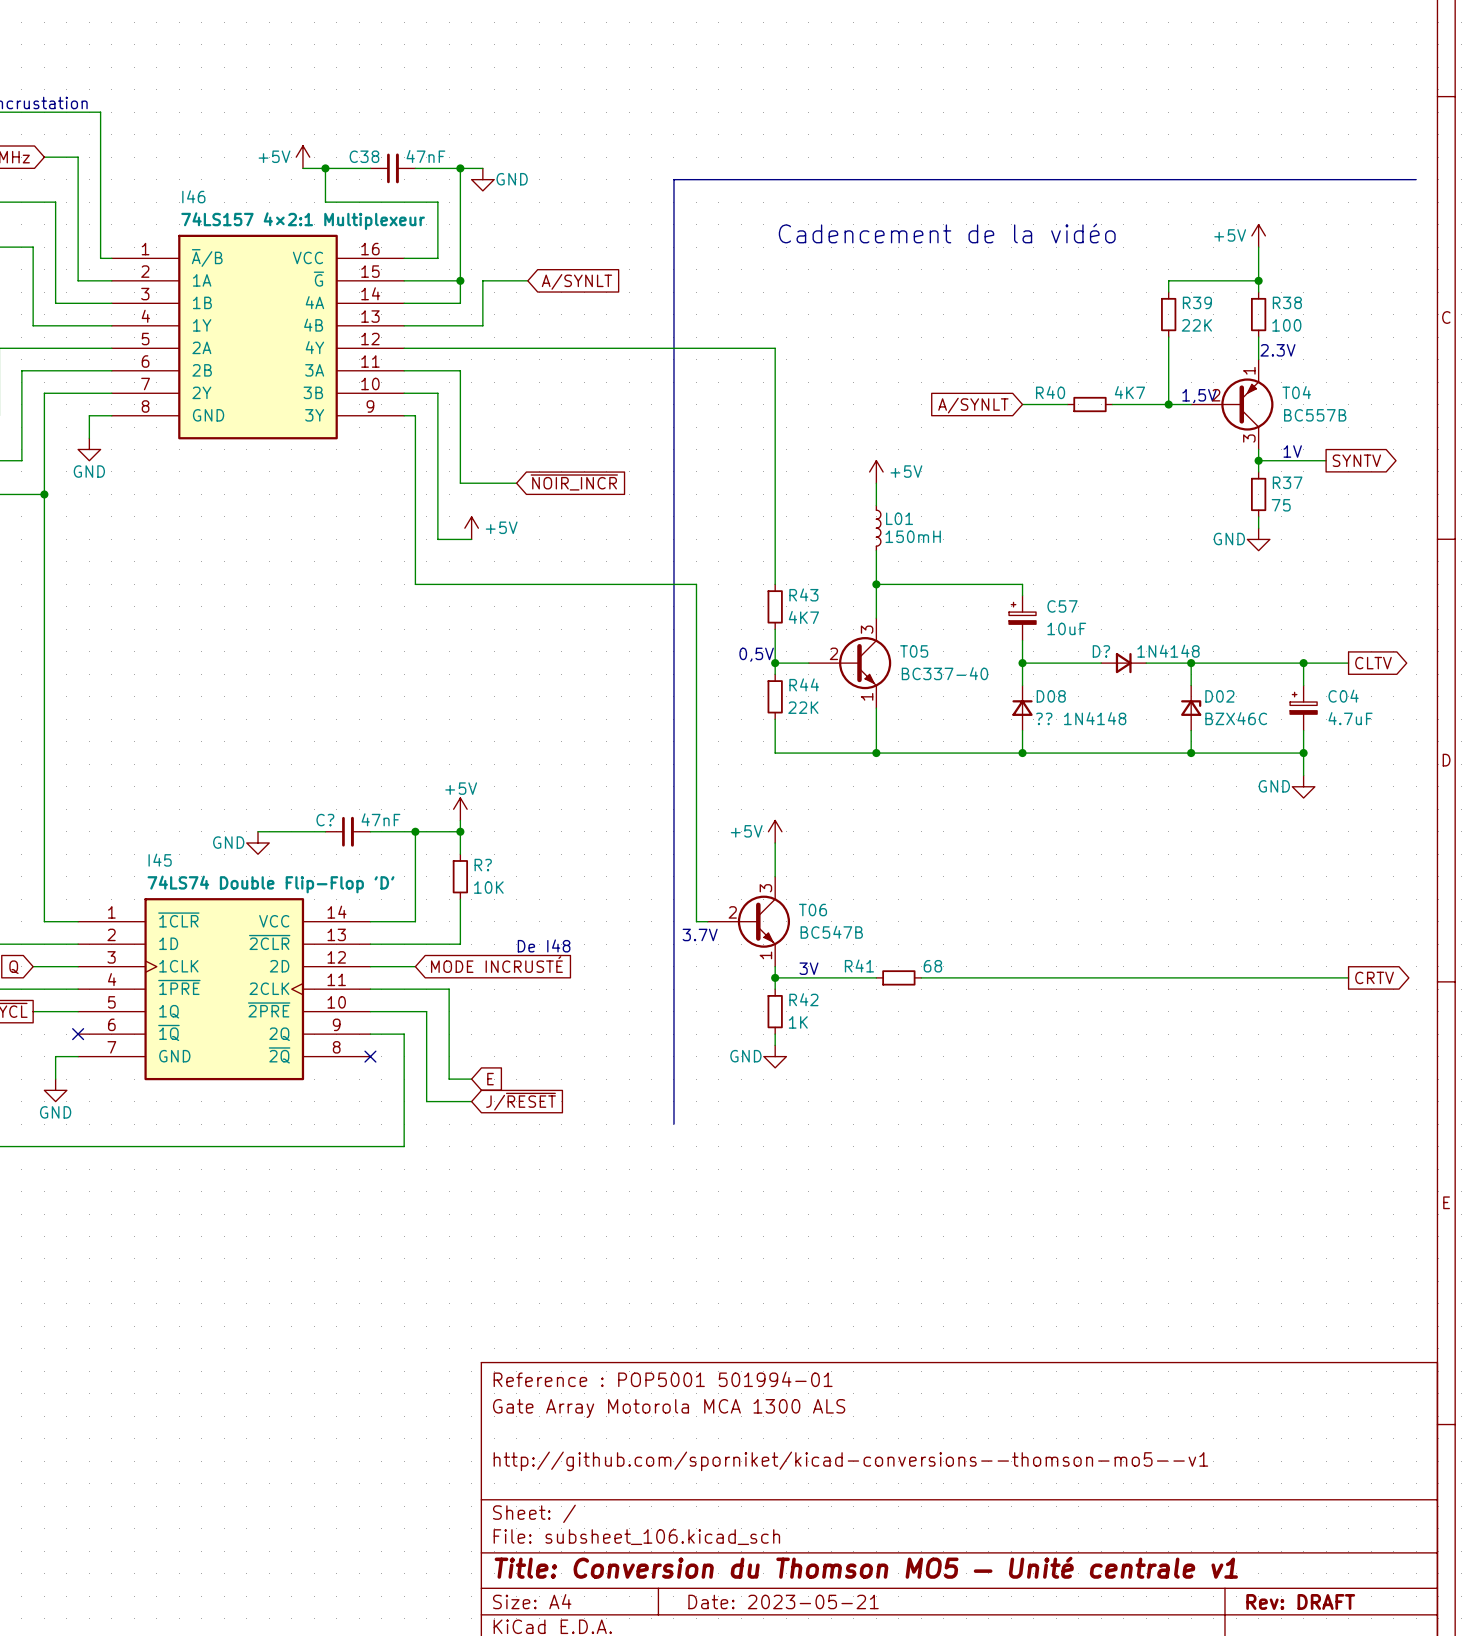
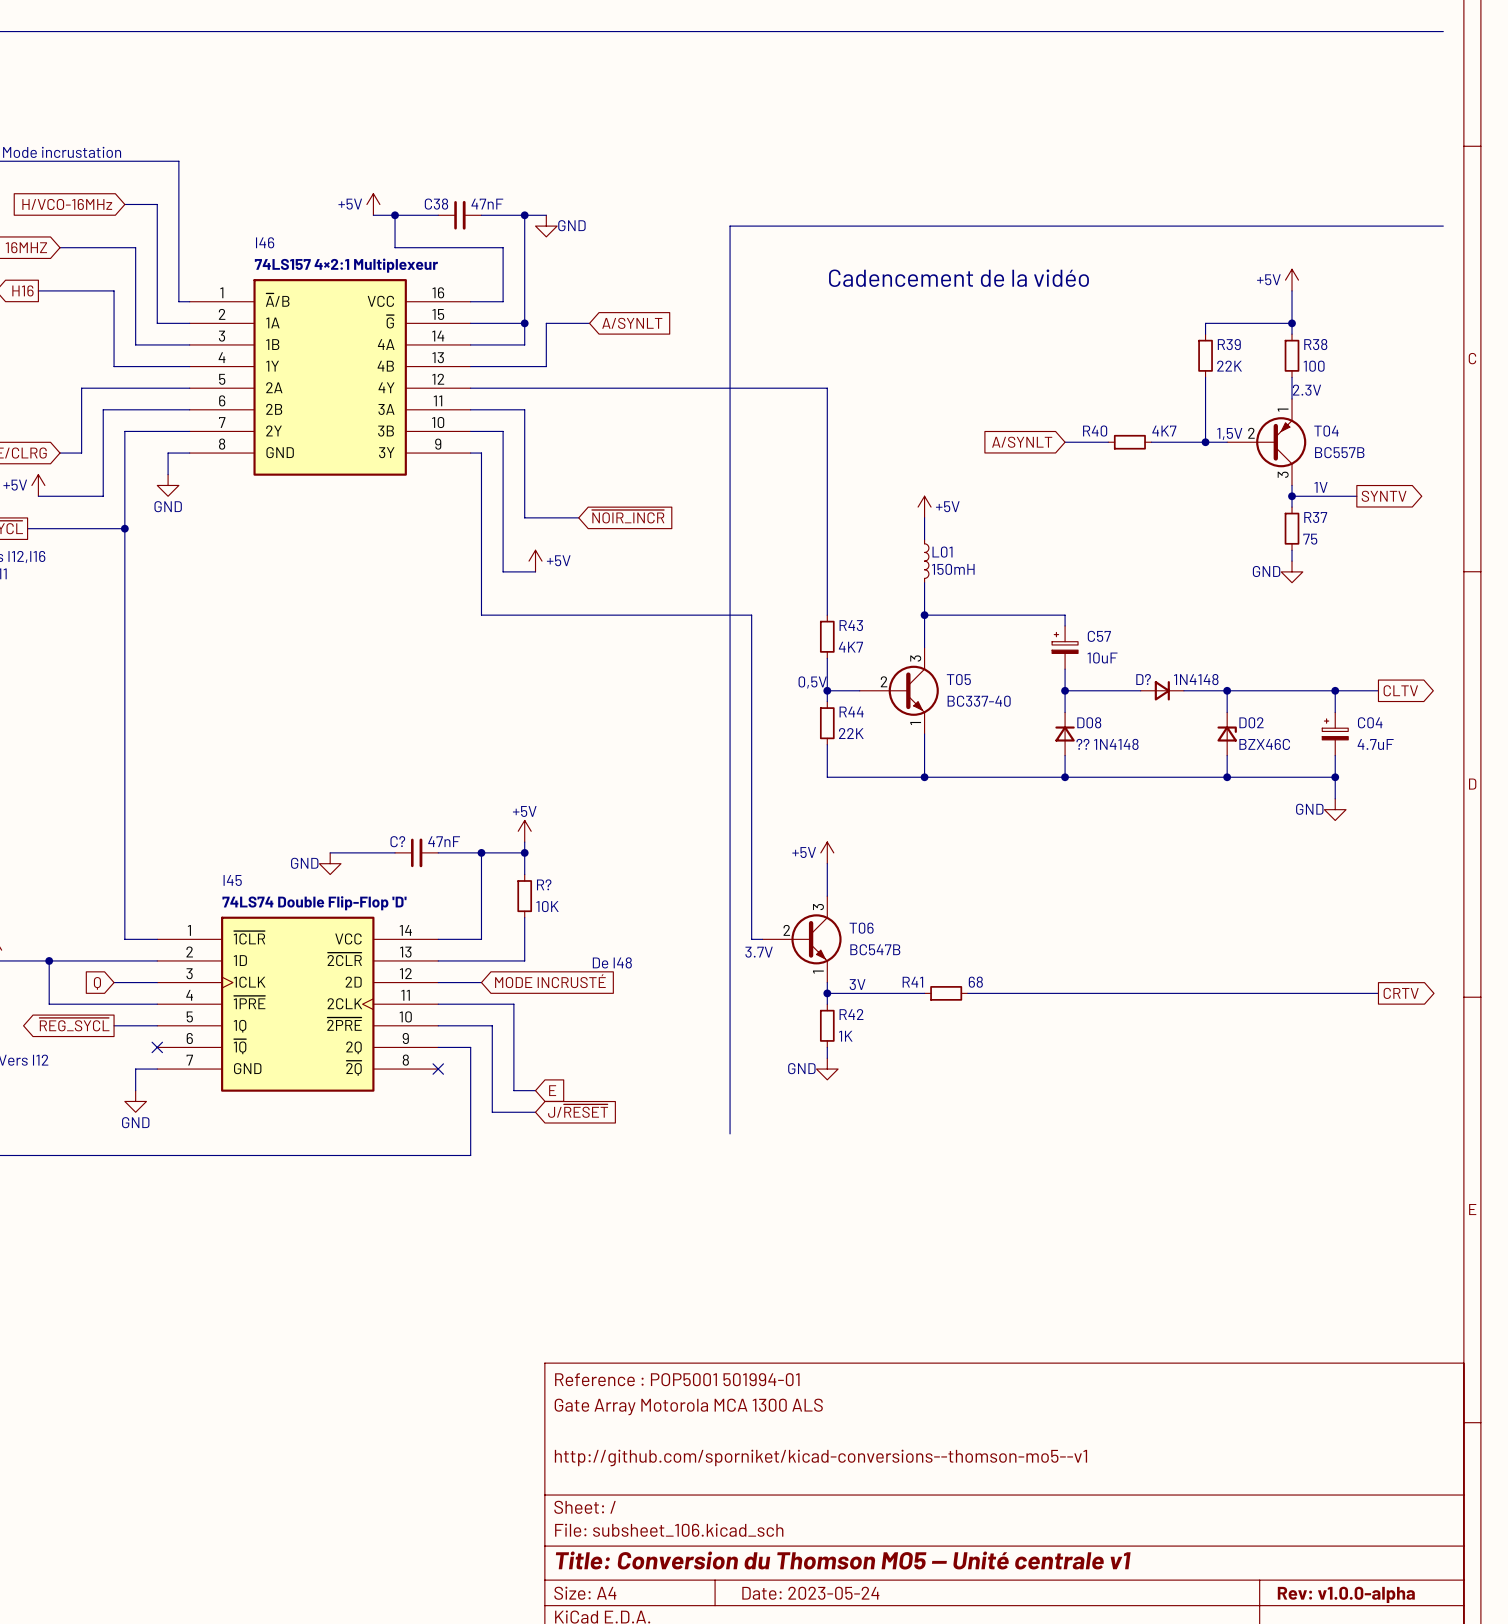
title block: Date: 2023-05-21 (783, 1601) -> Date: 2023-05-24 (810, 1593)
title block: Rev: DRAFT (1300, 1601) -> Rev: v1.0.0-alpha (1346, 1594)

